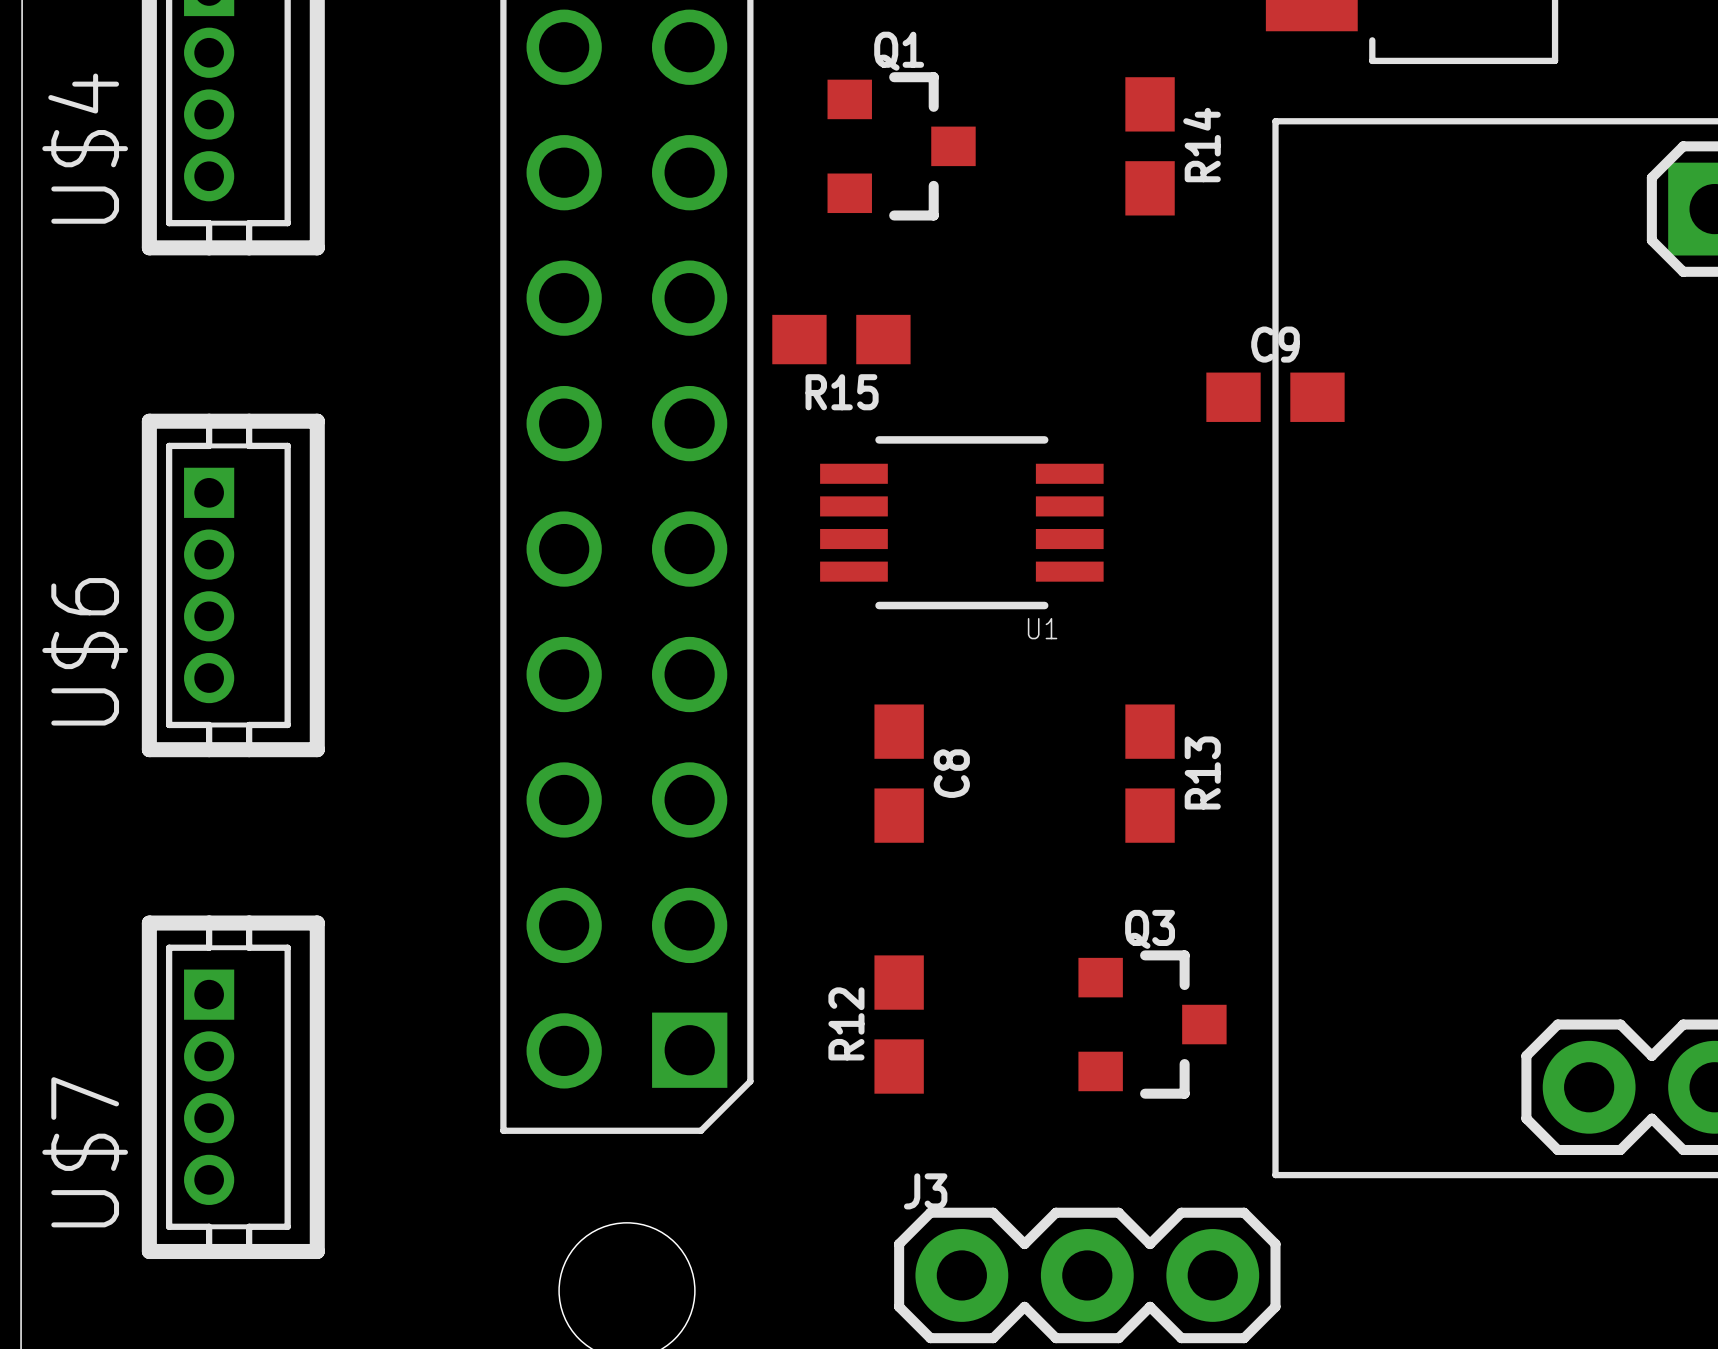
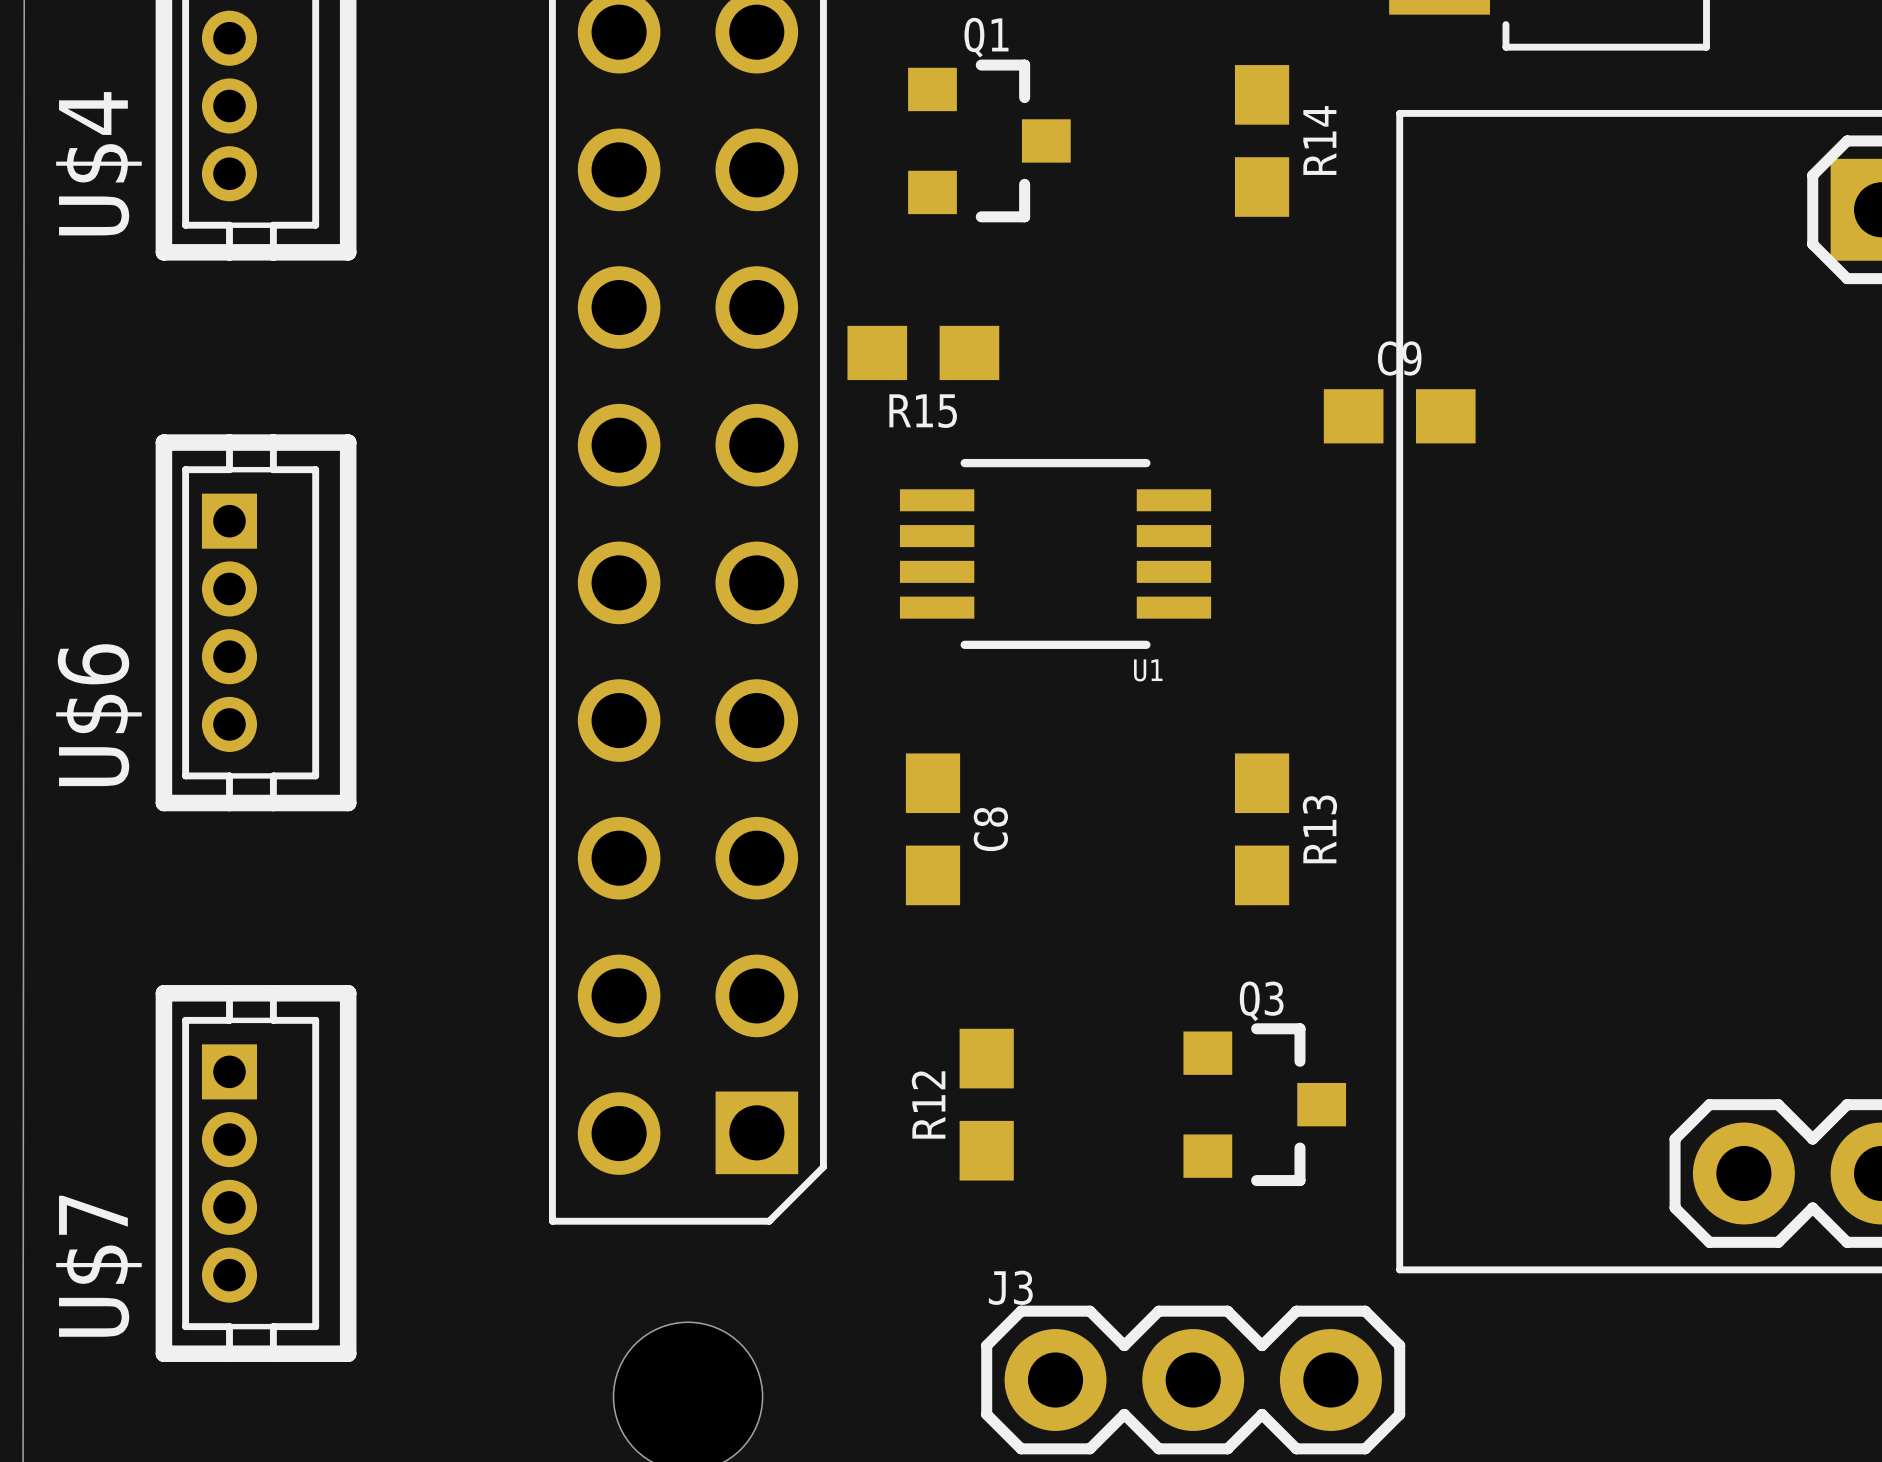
C8 position: (899, 773) -> (933, 829)

